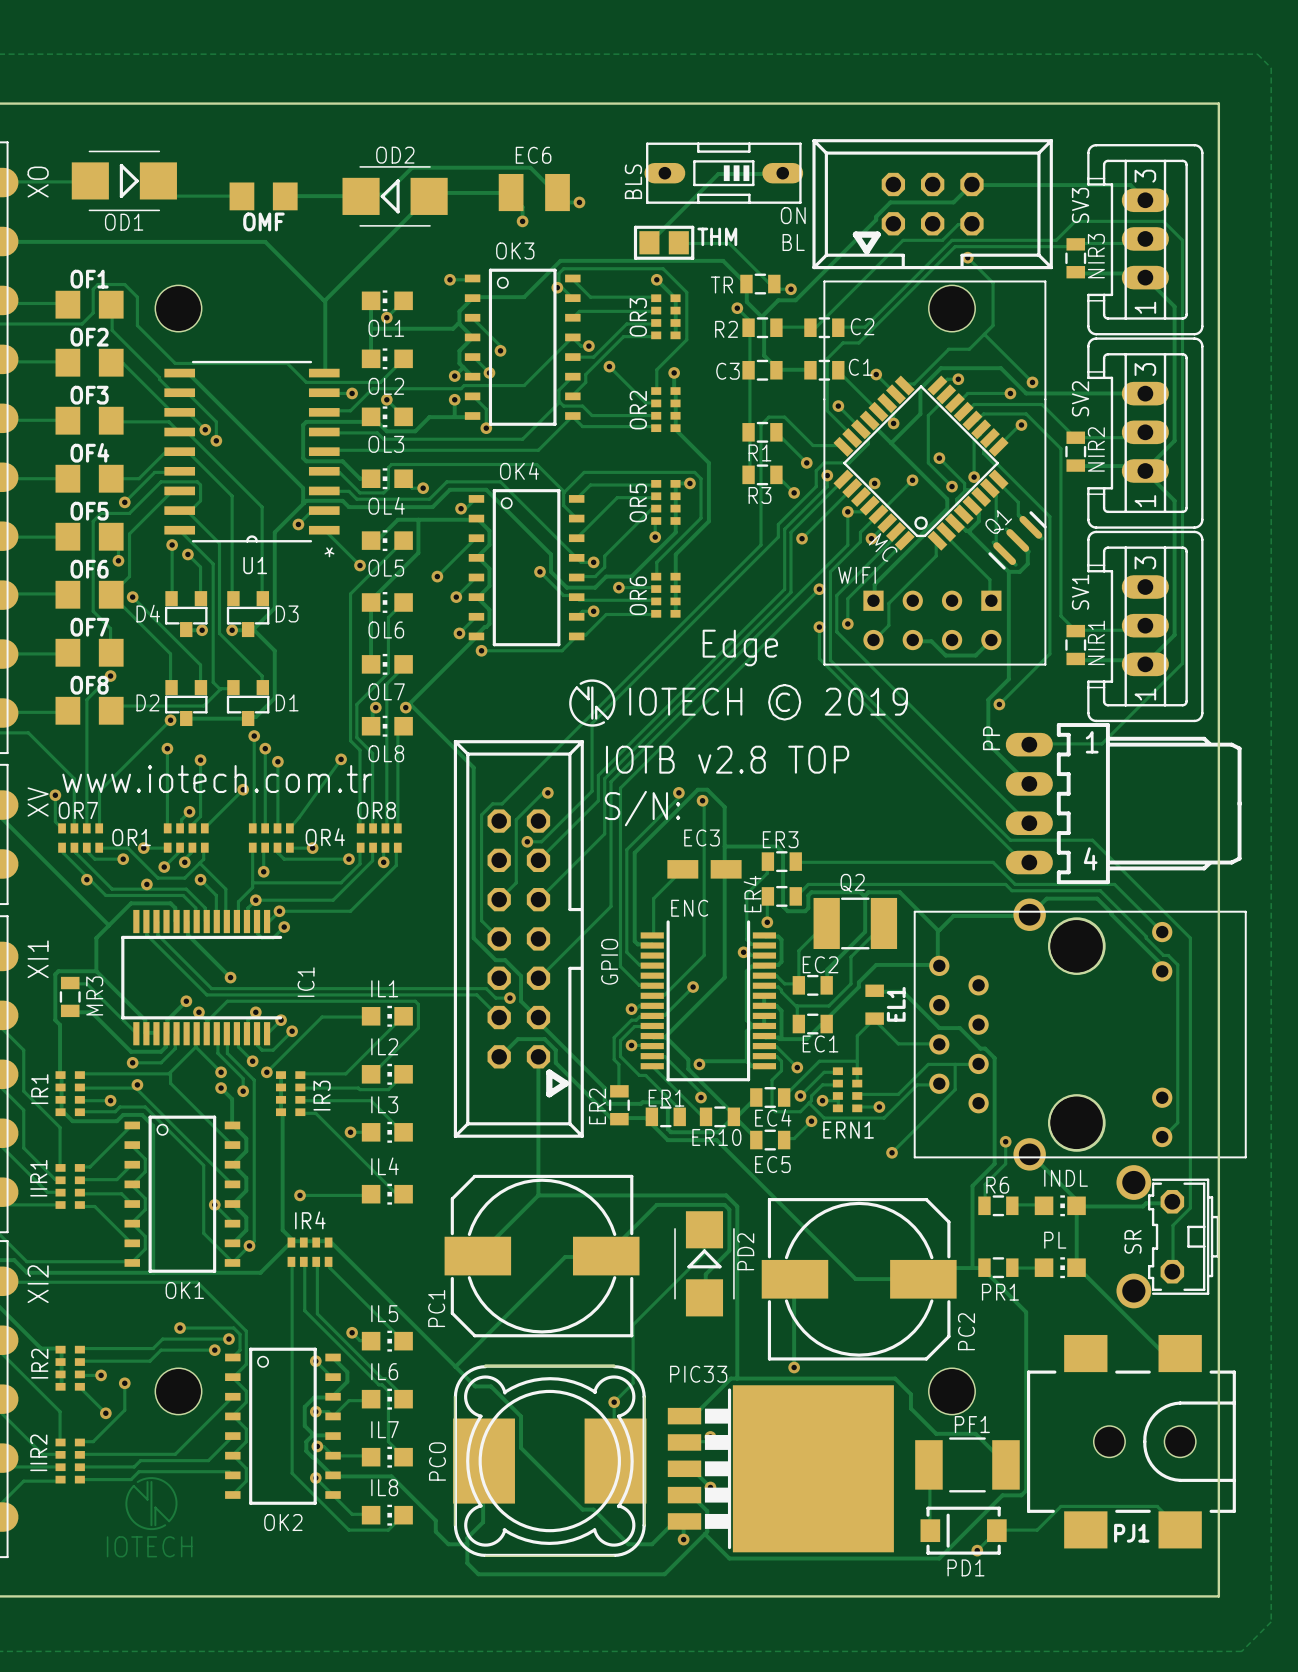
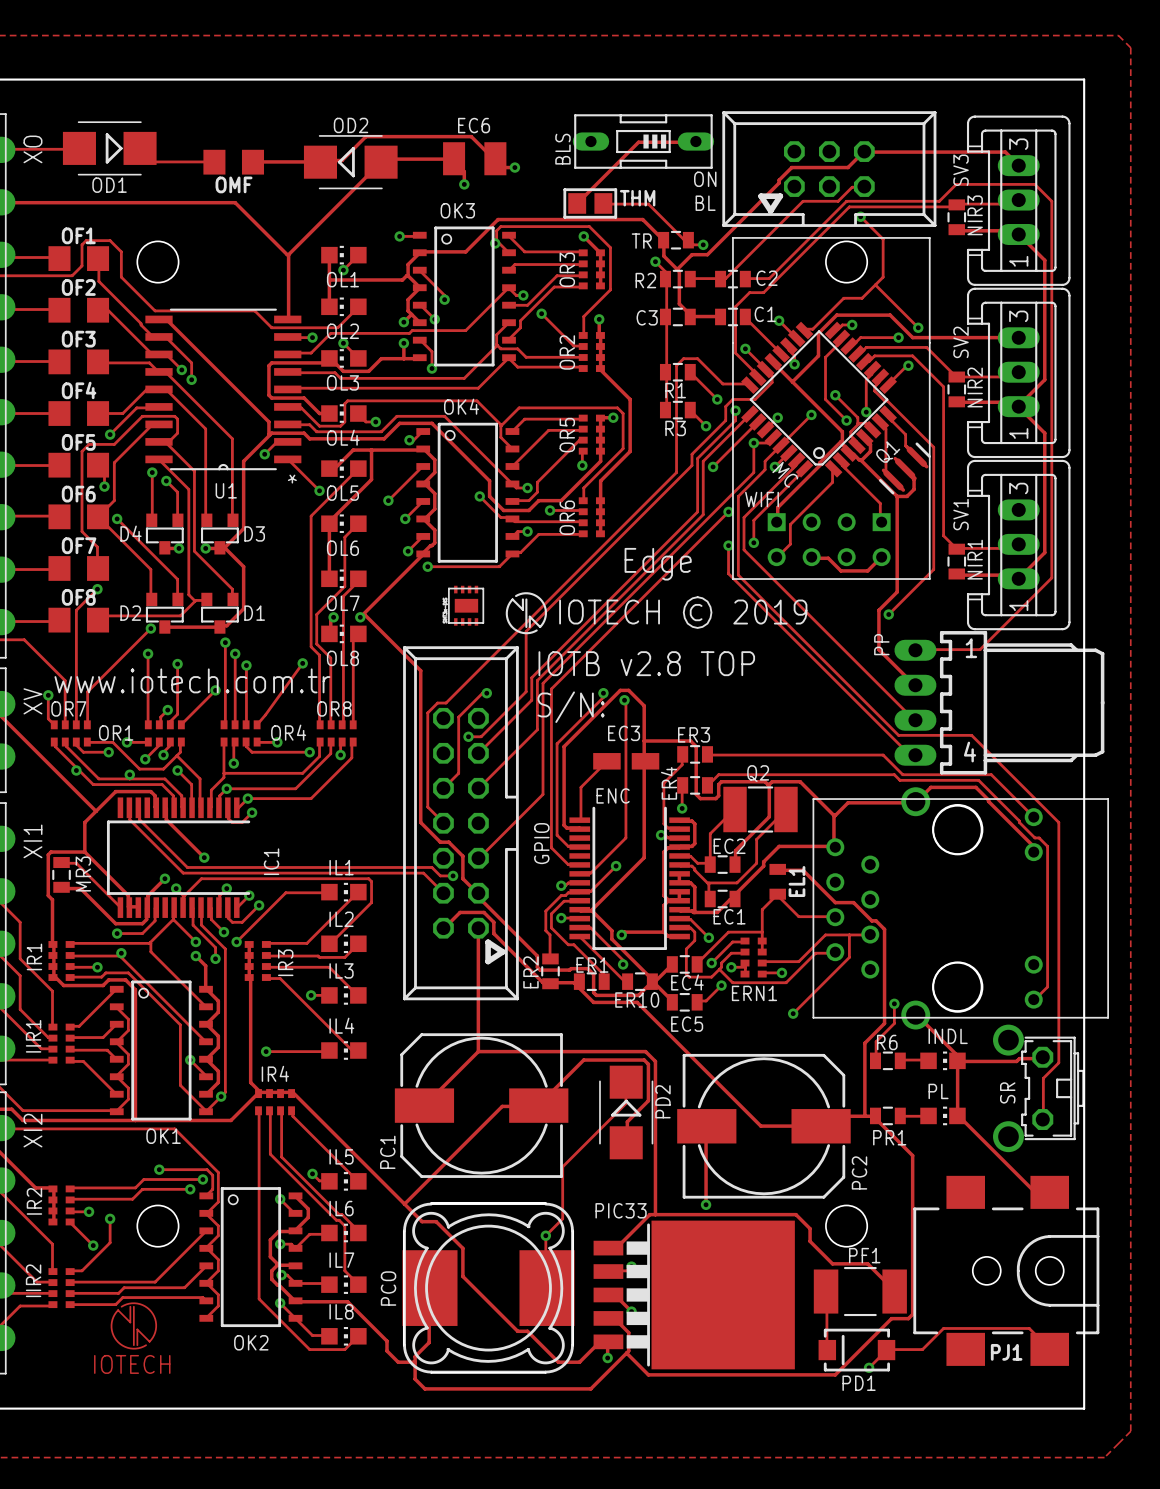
part: none -> (466, 605)

